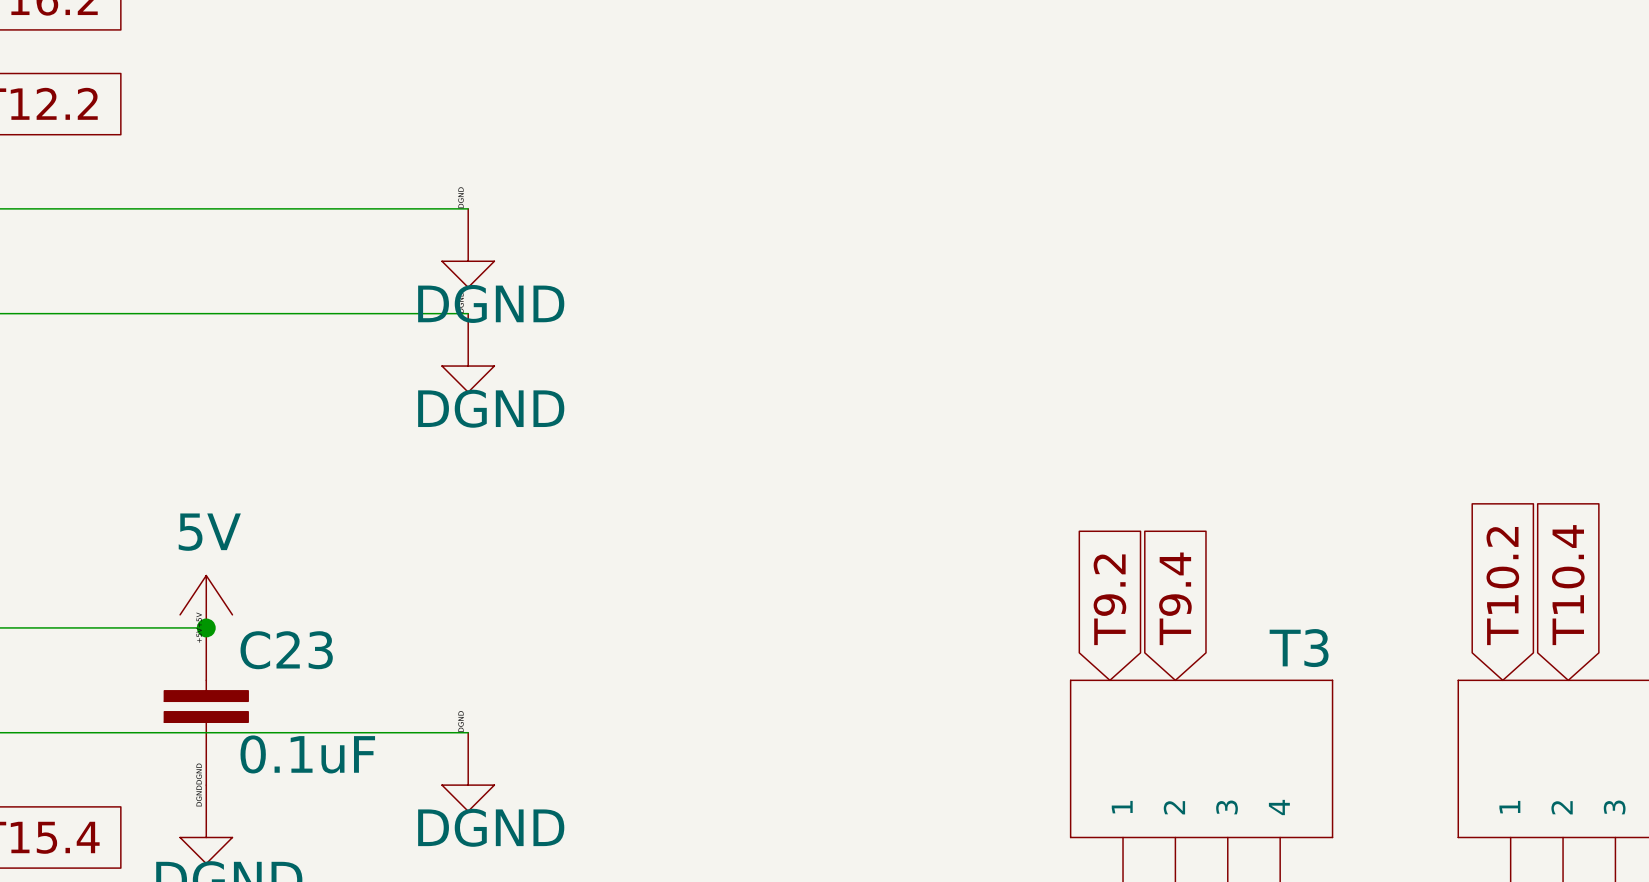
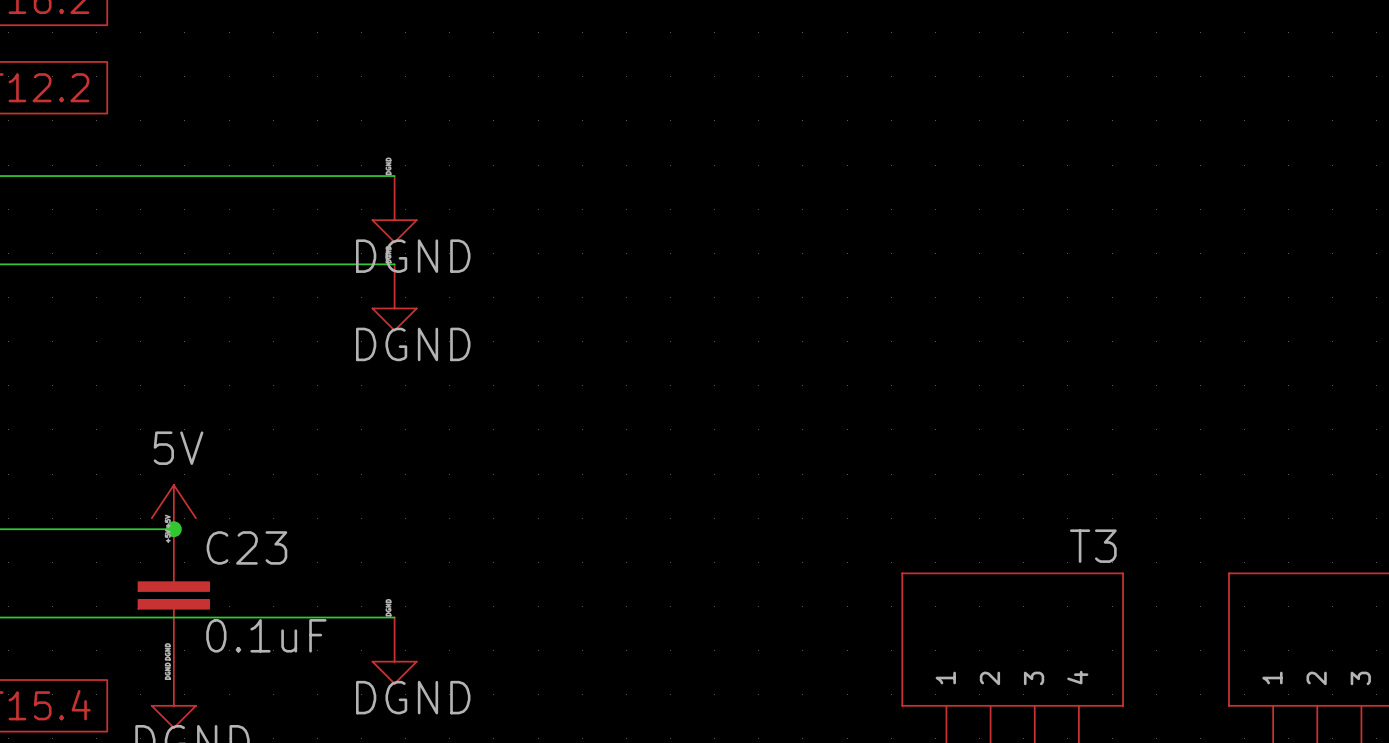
global label: T10.4 (1568, 585) -> none
global label: T10.2 (1502, 586) -> none
global label: T9.4 (1175, 598) -> none
global label: T9.2 (1109, 599) -> none

